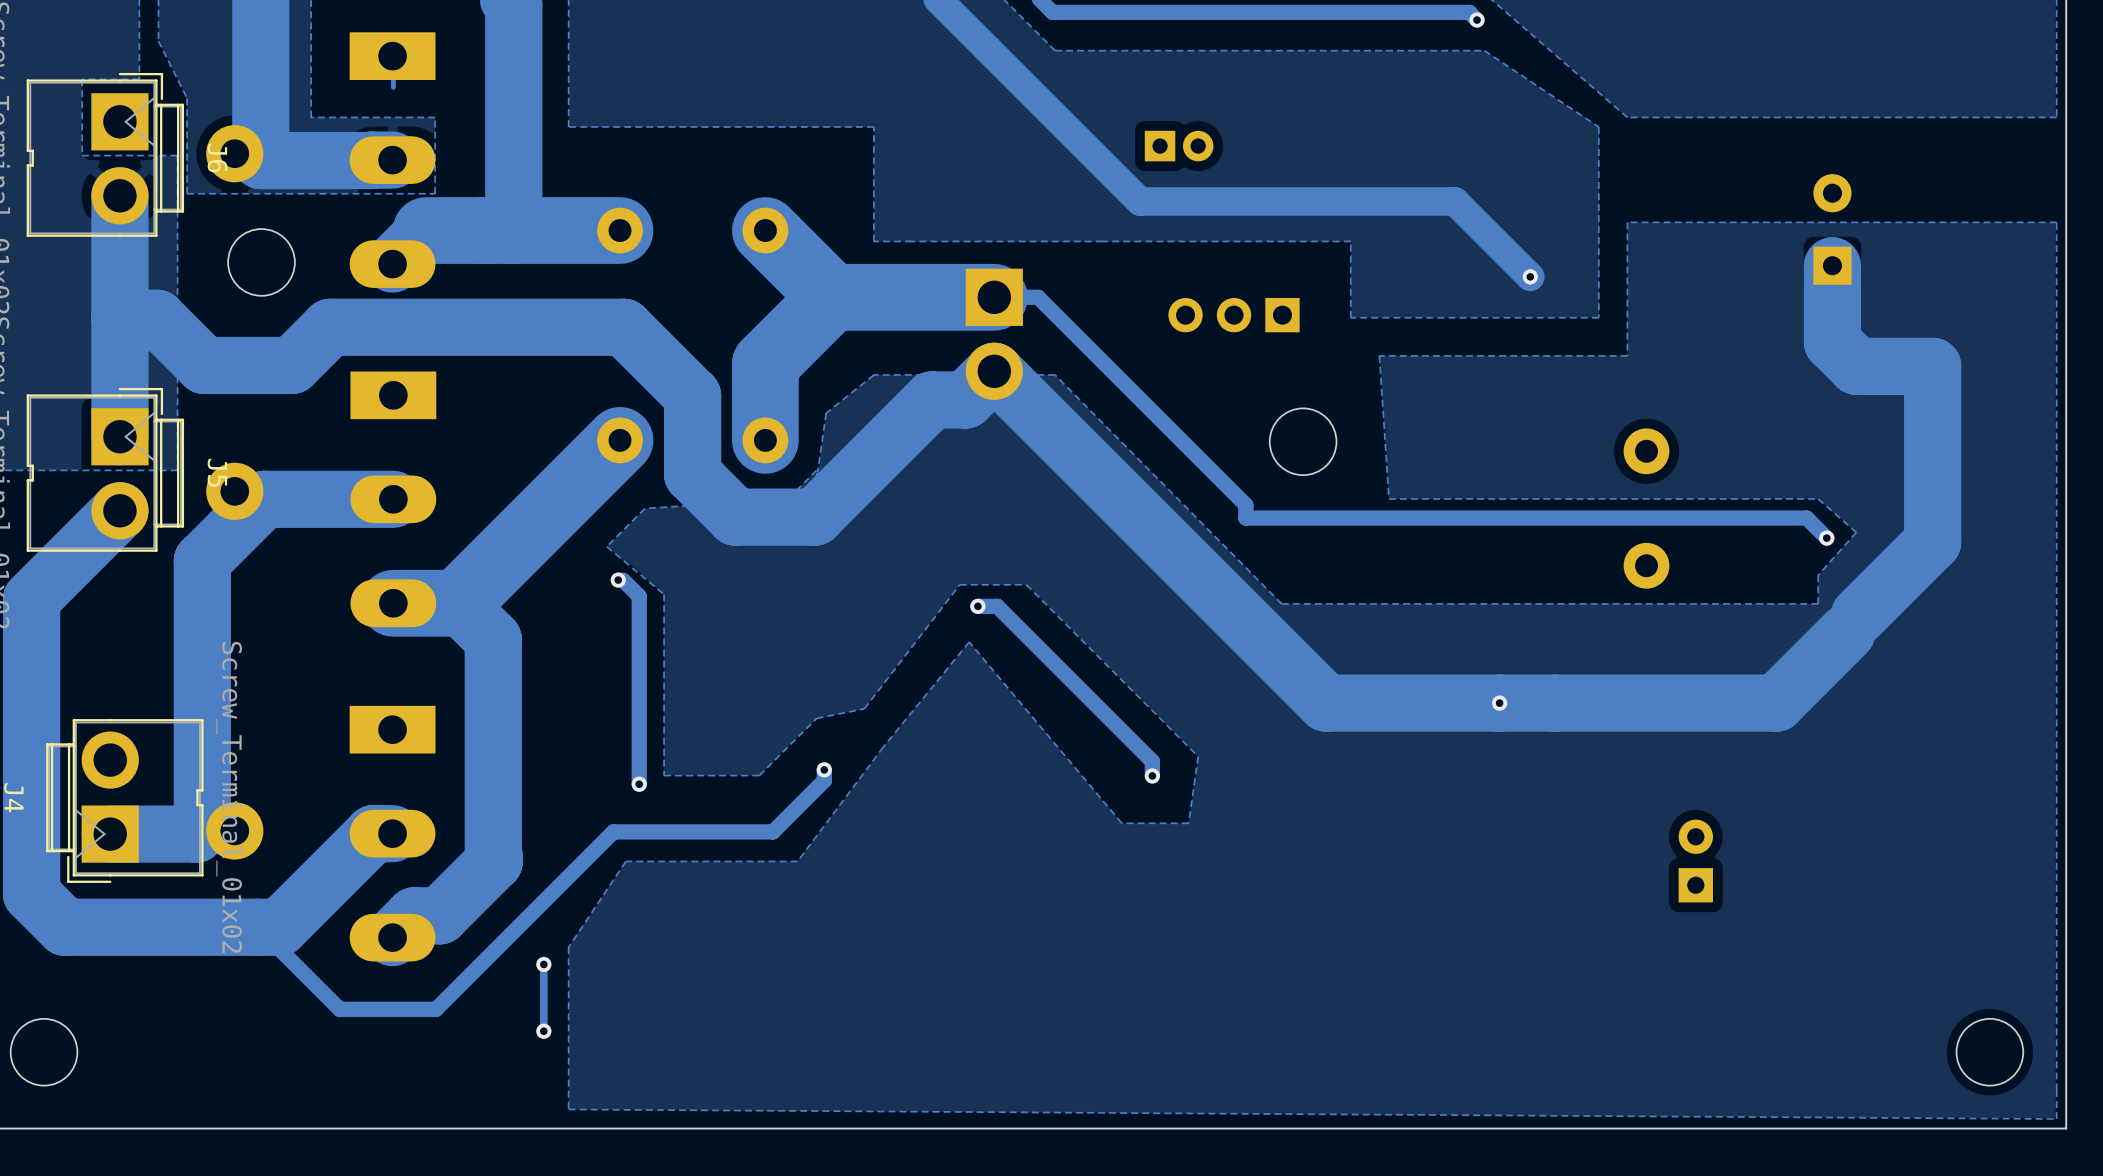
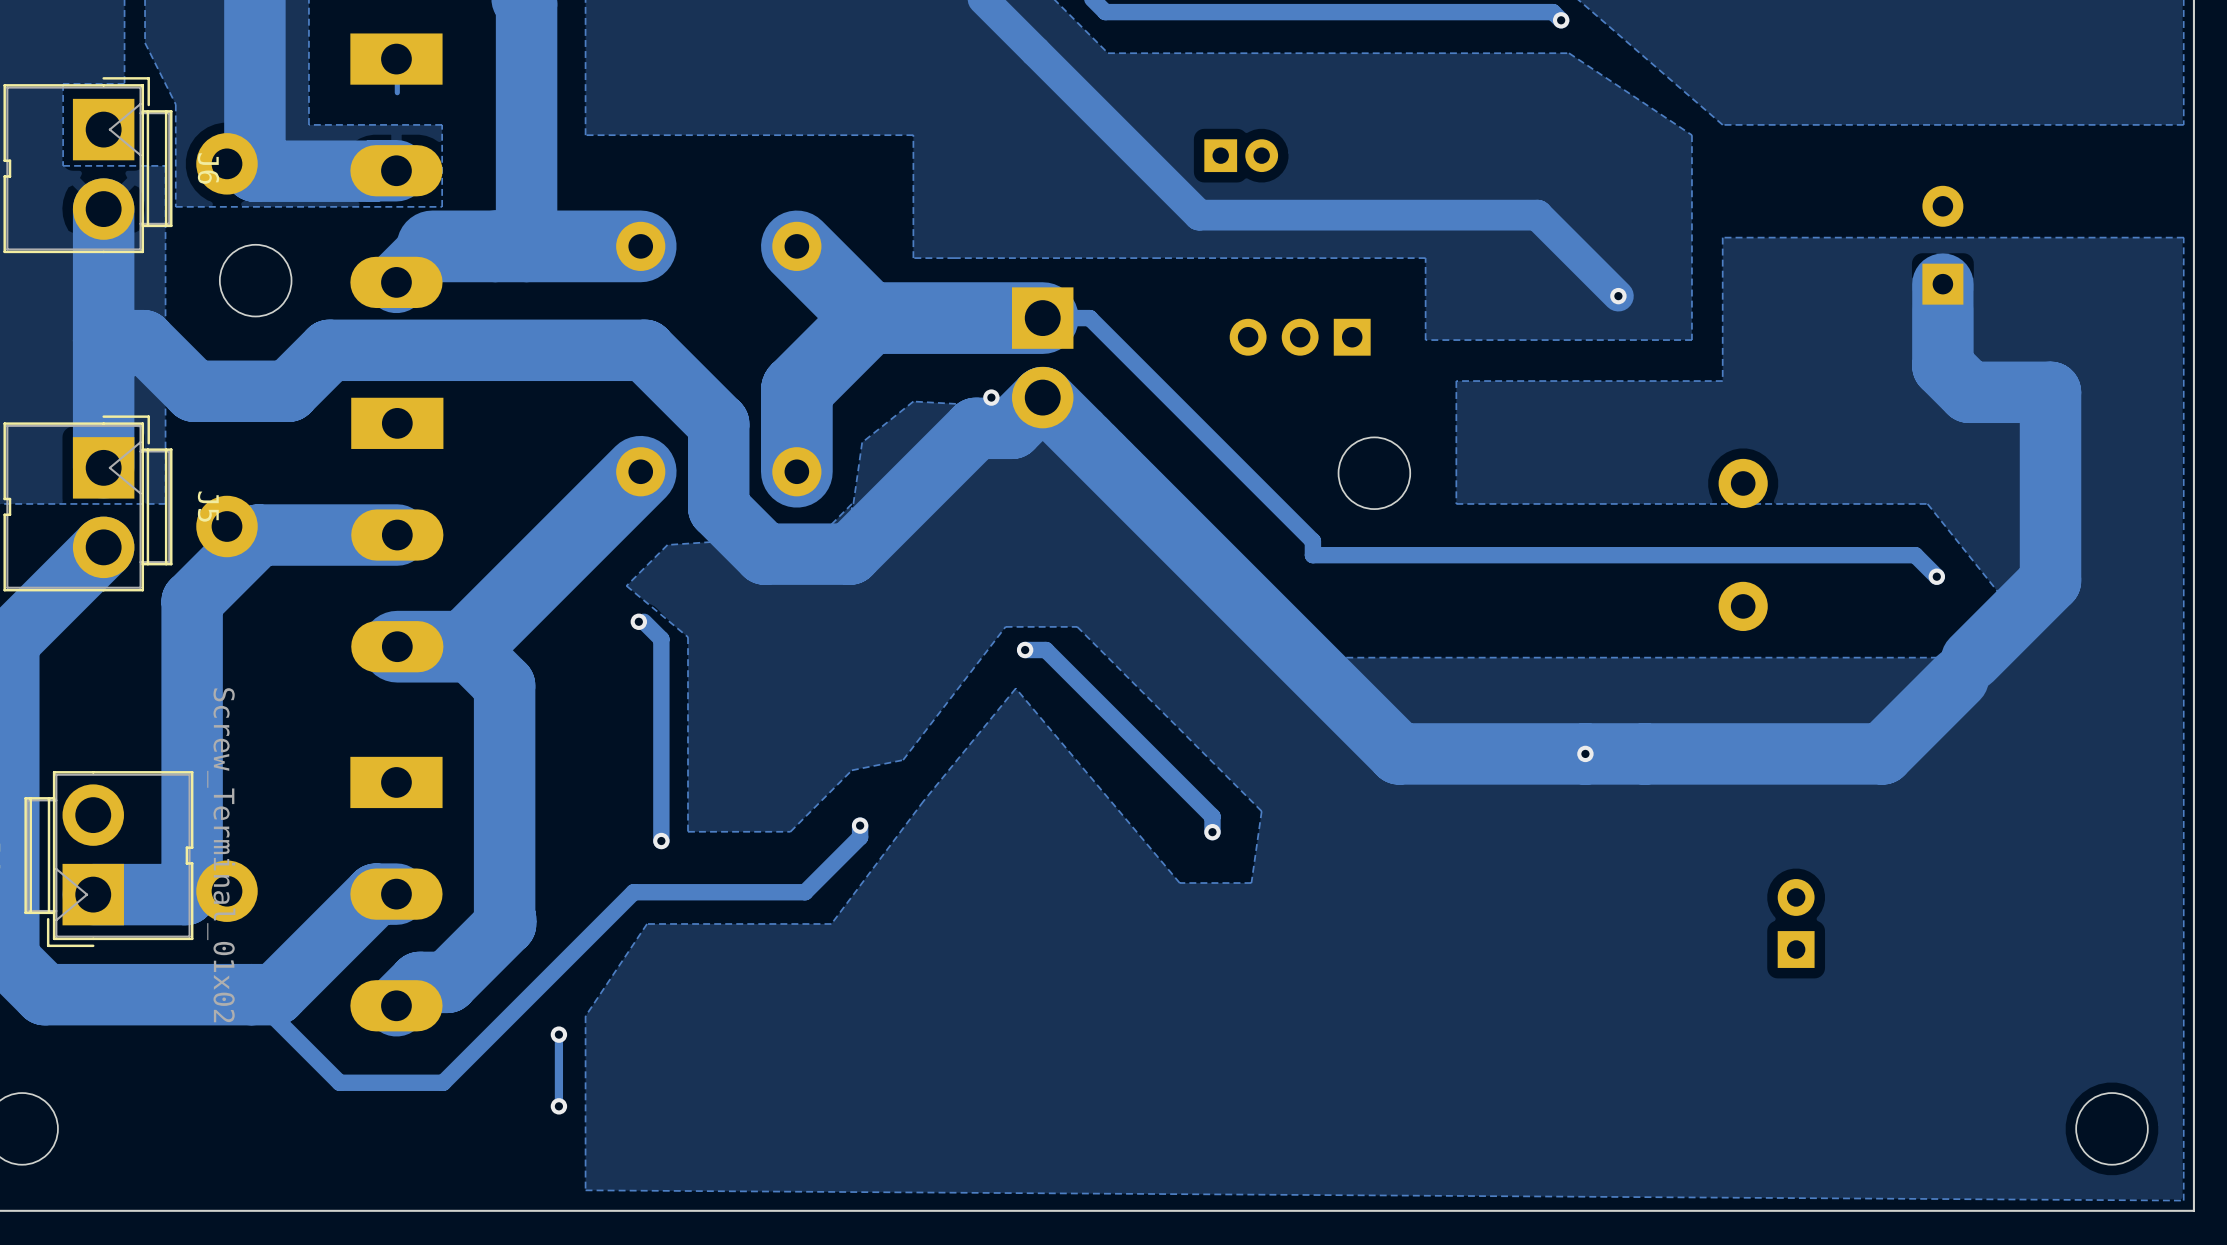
zone outline: (1379, 355) (1388, 498) (1818, 498) (1856, 532) (1818, 575) (1818, 603) (1281, 603) (1055, 374) (873, 374) -> (1456, 381) (1456, 503) (1927, 503) (1999, 593) (1958, 639) (1937, 657) (1342, 657) (1099, 411) (913, 401)
via: none -> (991, 397)

